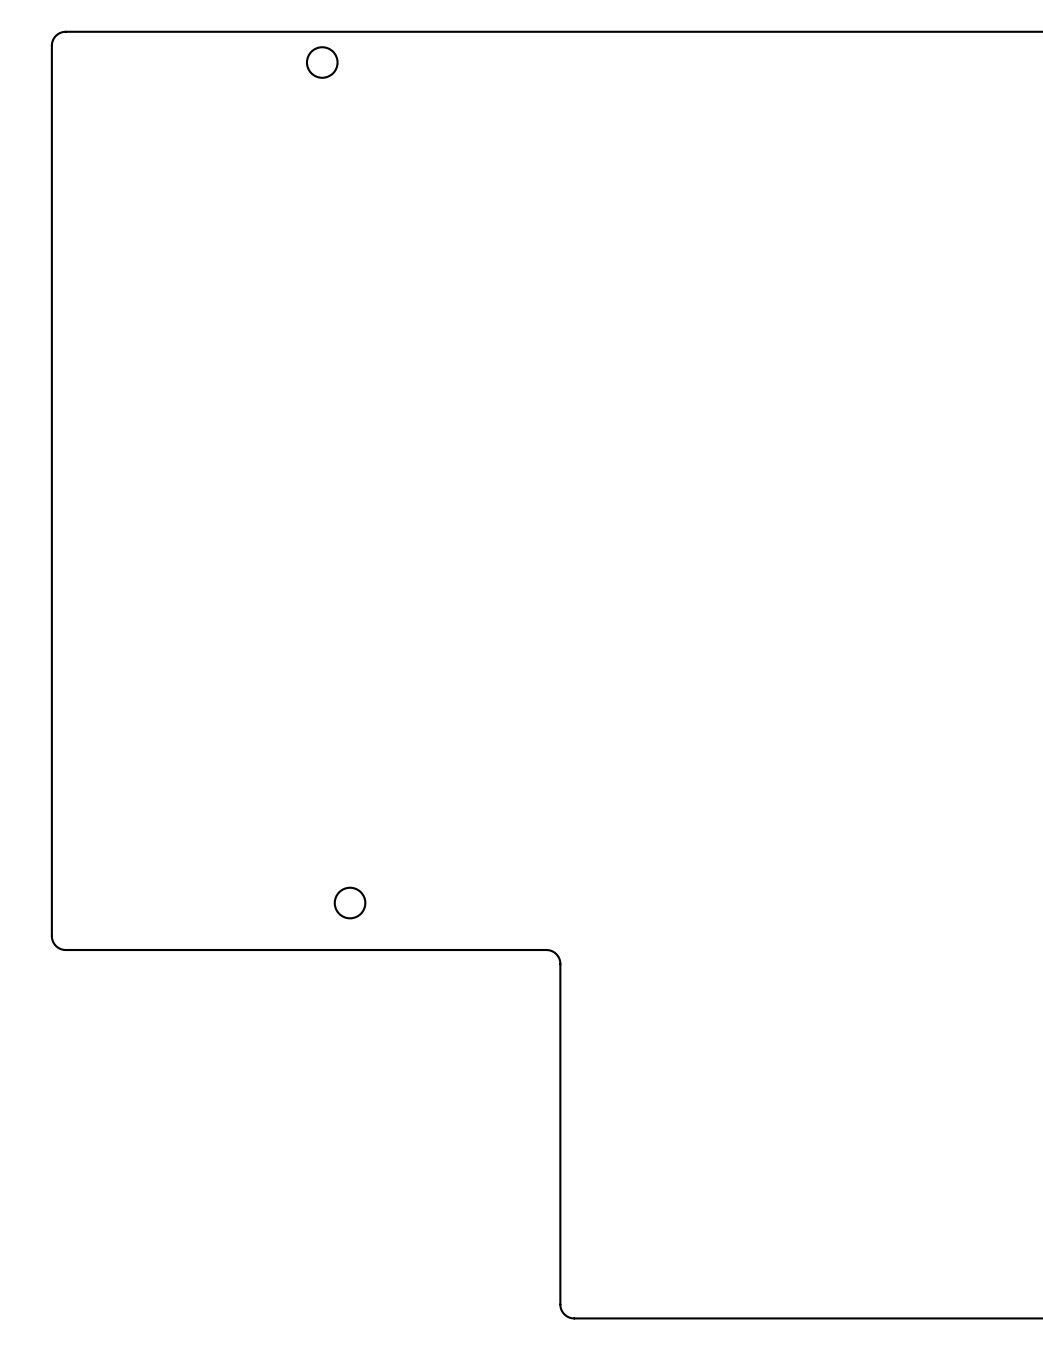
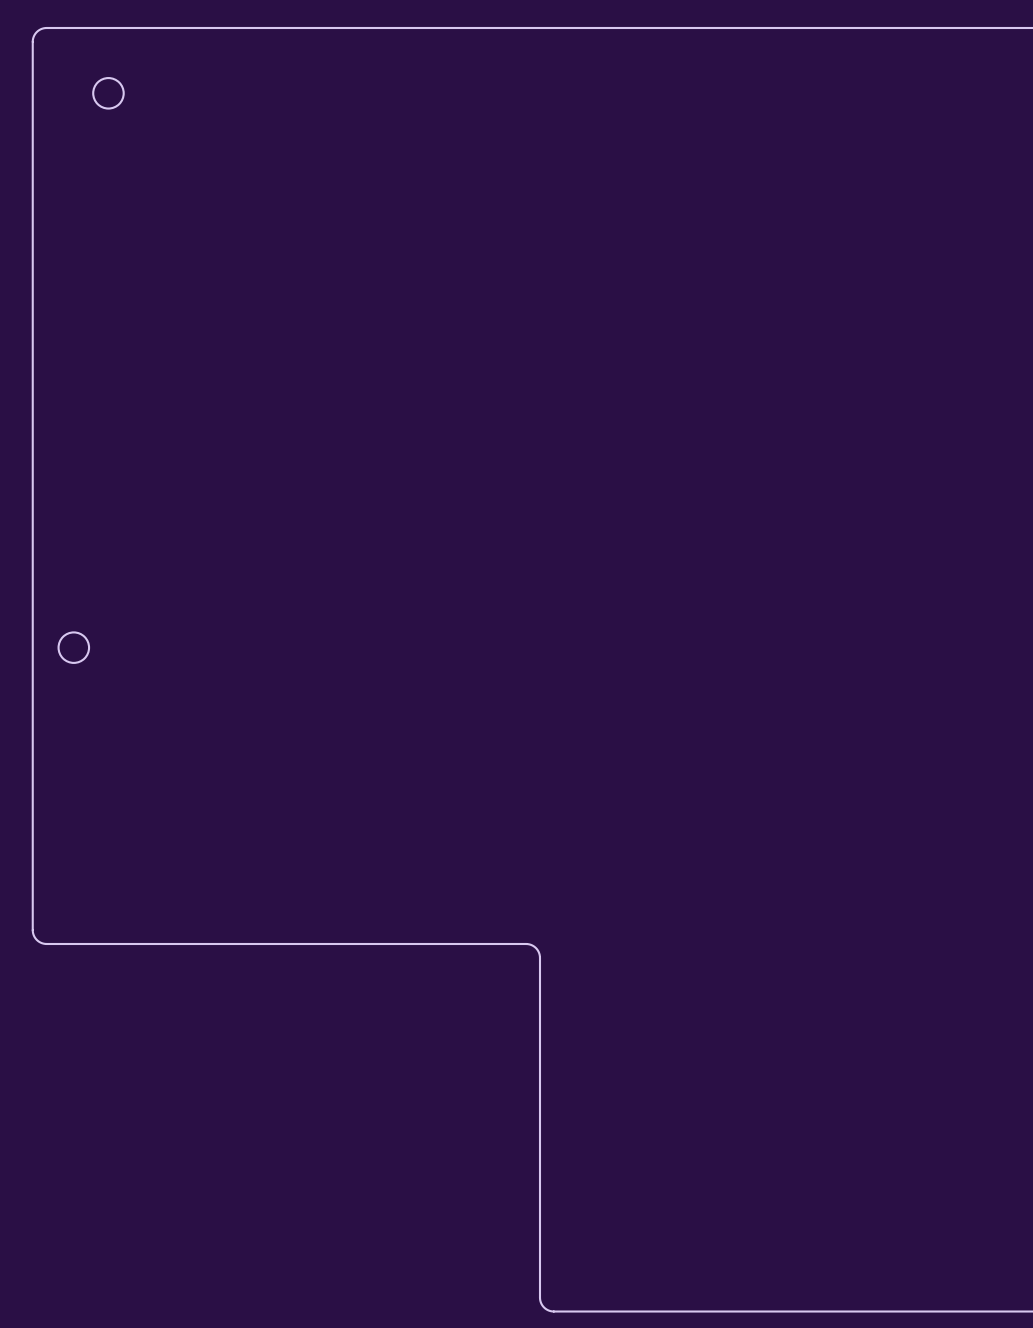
round board edge position: (322, 62) -> (108, 93)
round board edge: none -> [57, 631, 91, 664]
round board edge: [333, 886, 367, 920] -> none

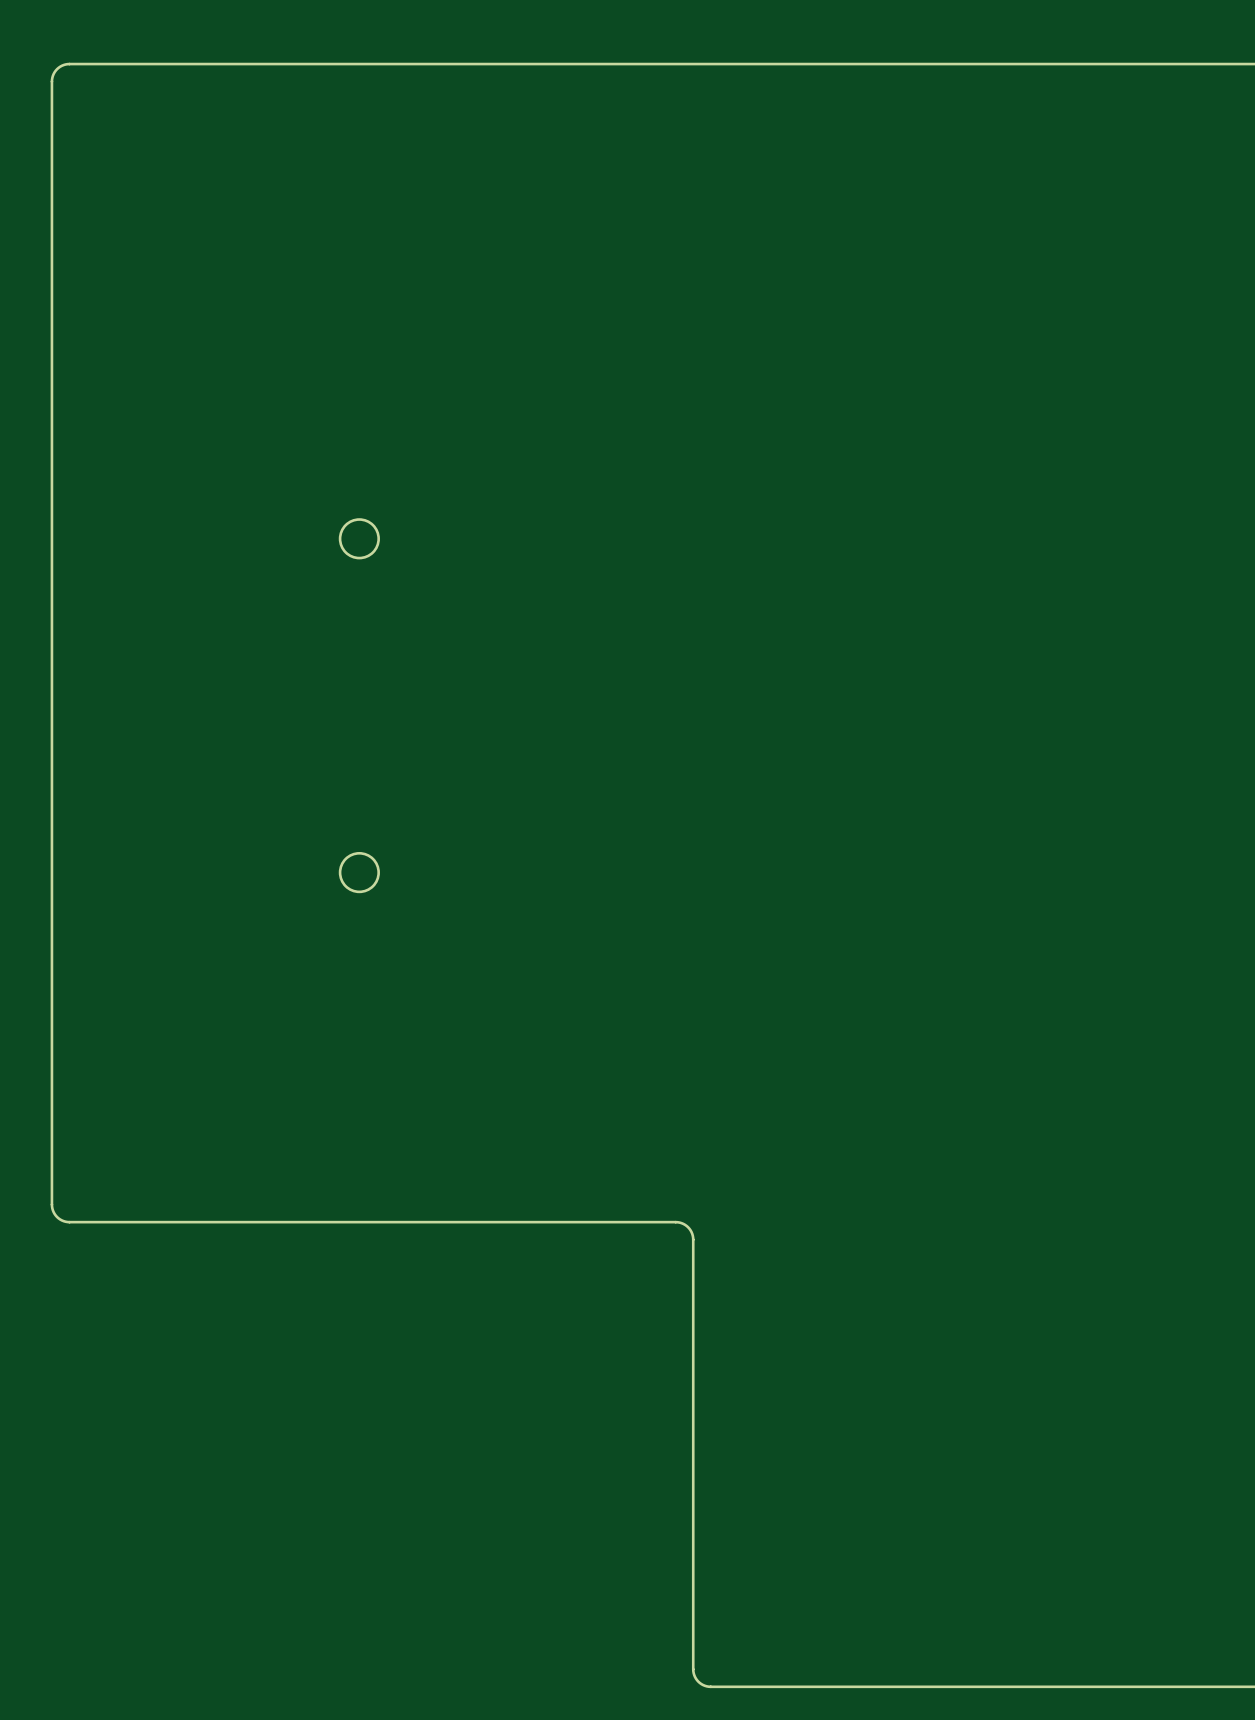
round board edge: [92, 77, 125, 110] -> none
round board edge: none -> [338, 518, 380, 560]
round board edge: [57, 631, 91, 664] -> none
round board edge: none -> [338, 851, 380, 894]

